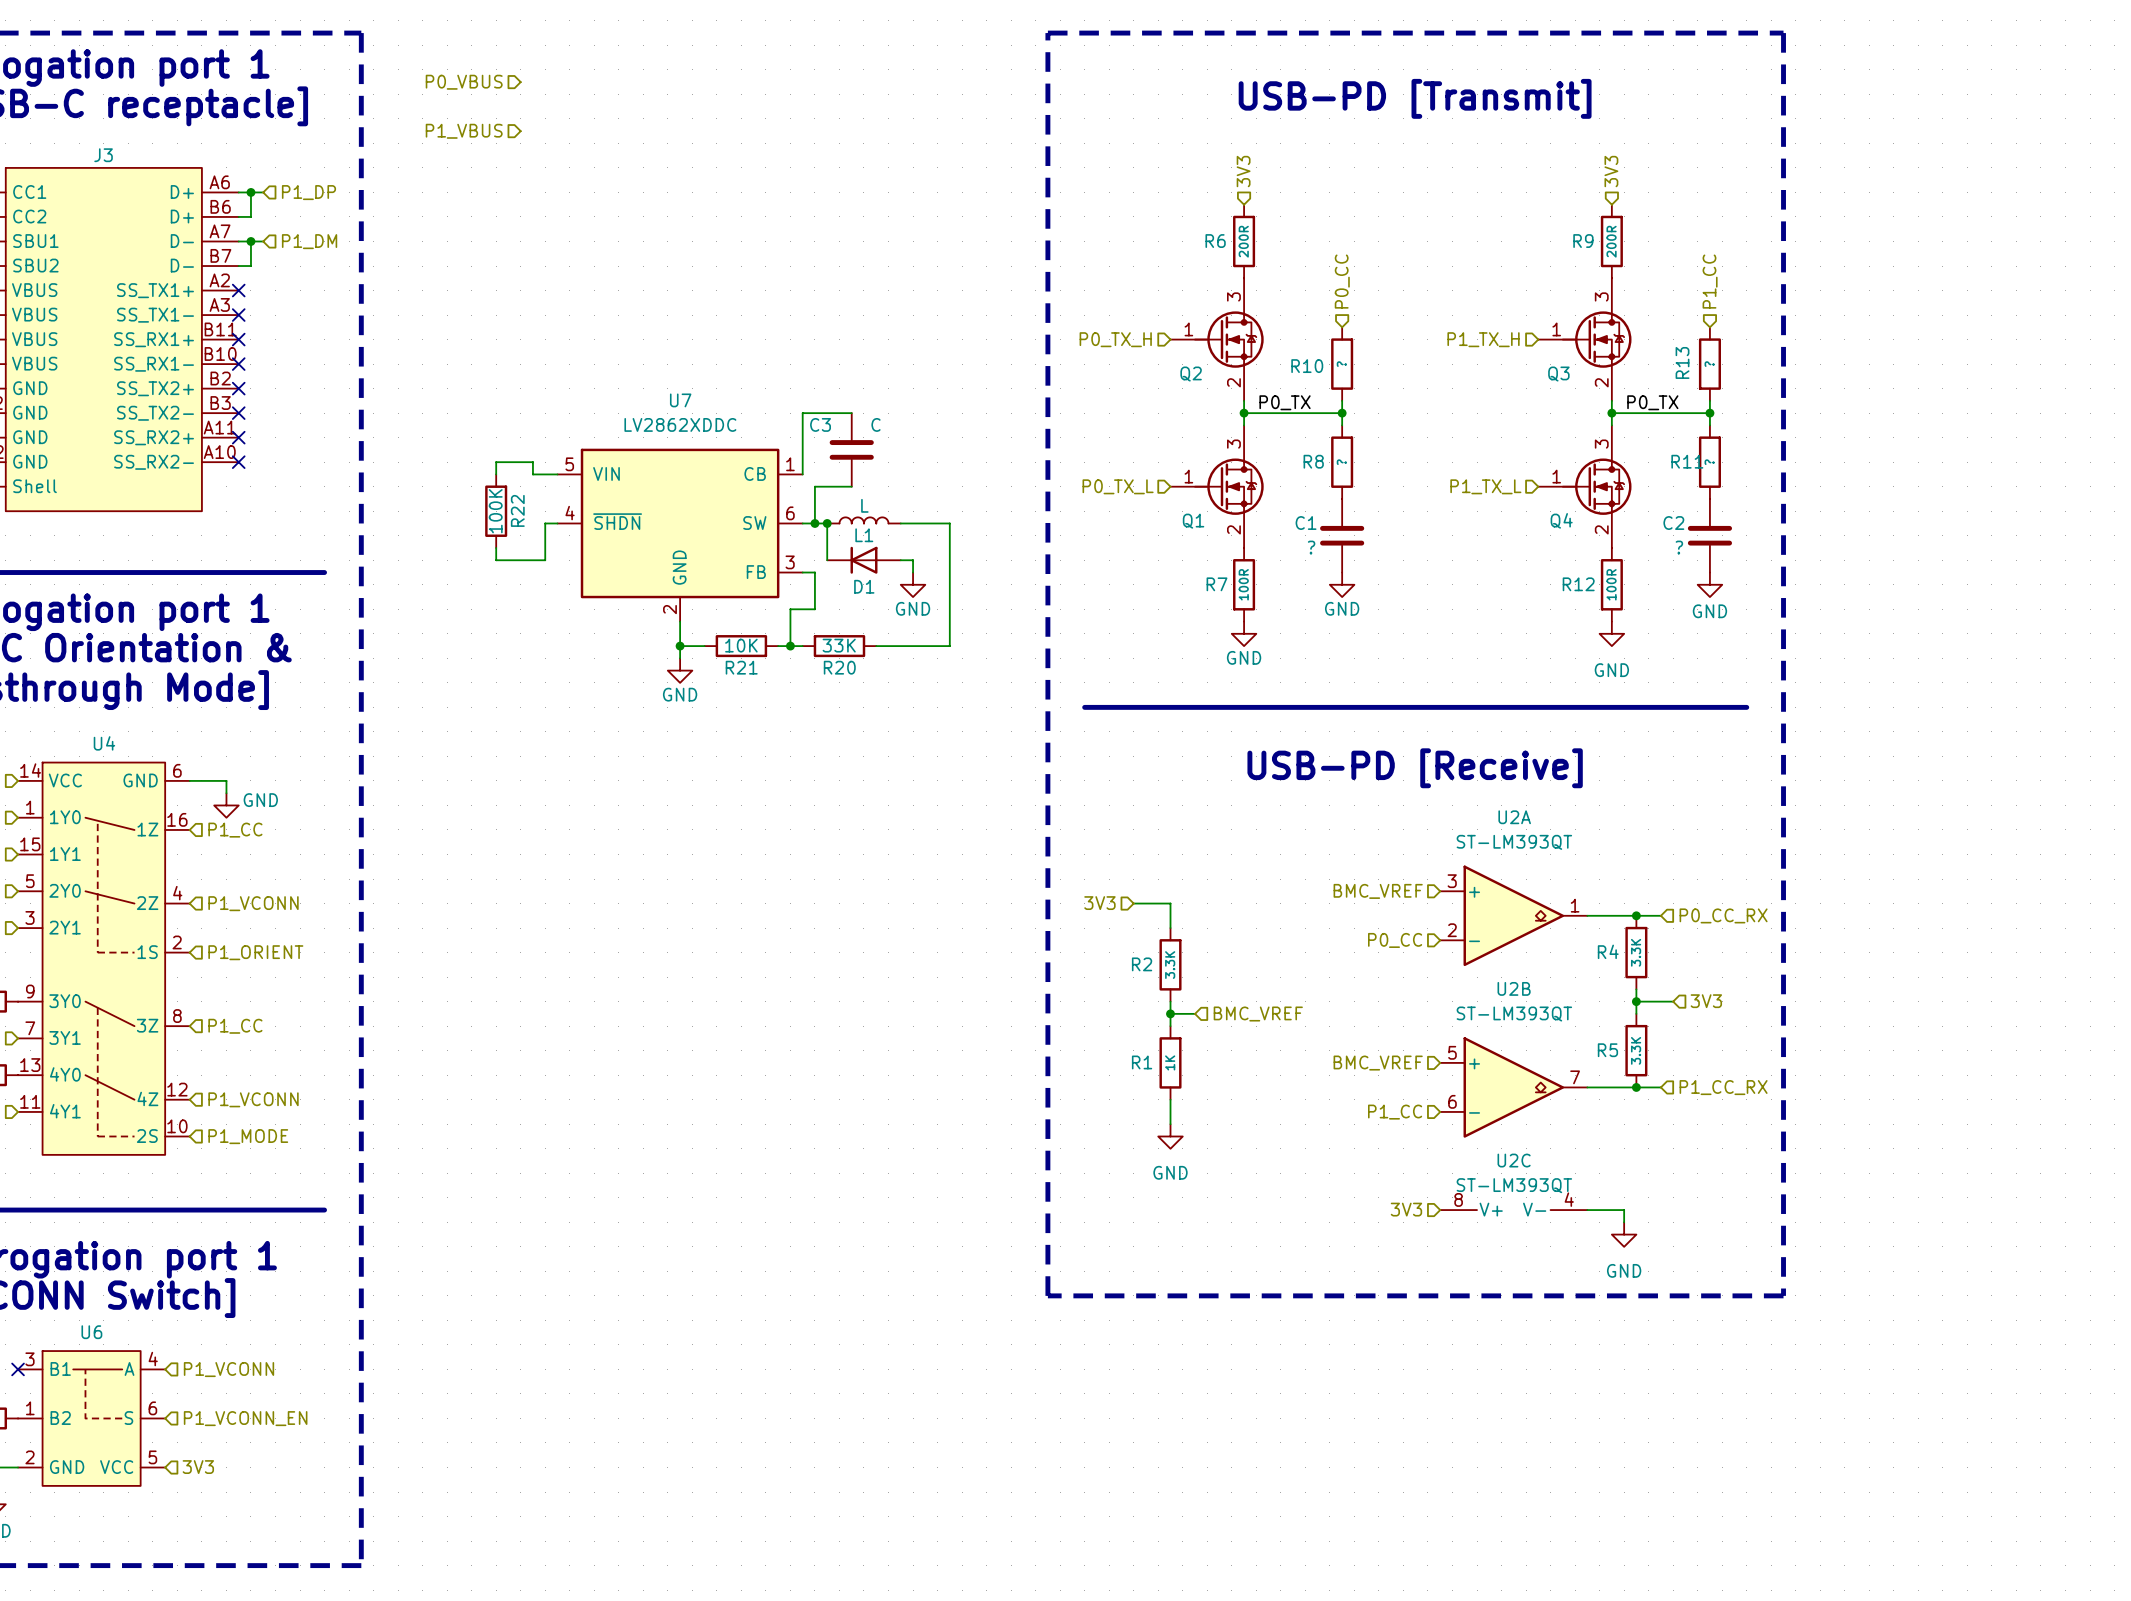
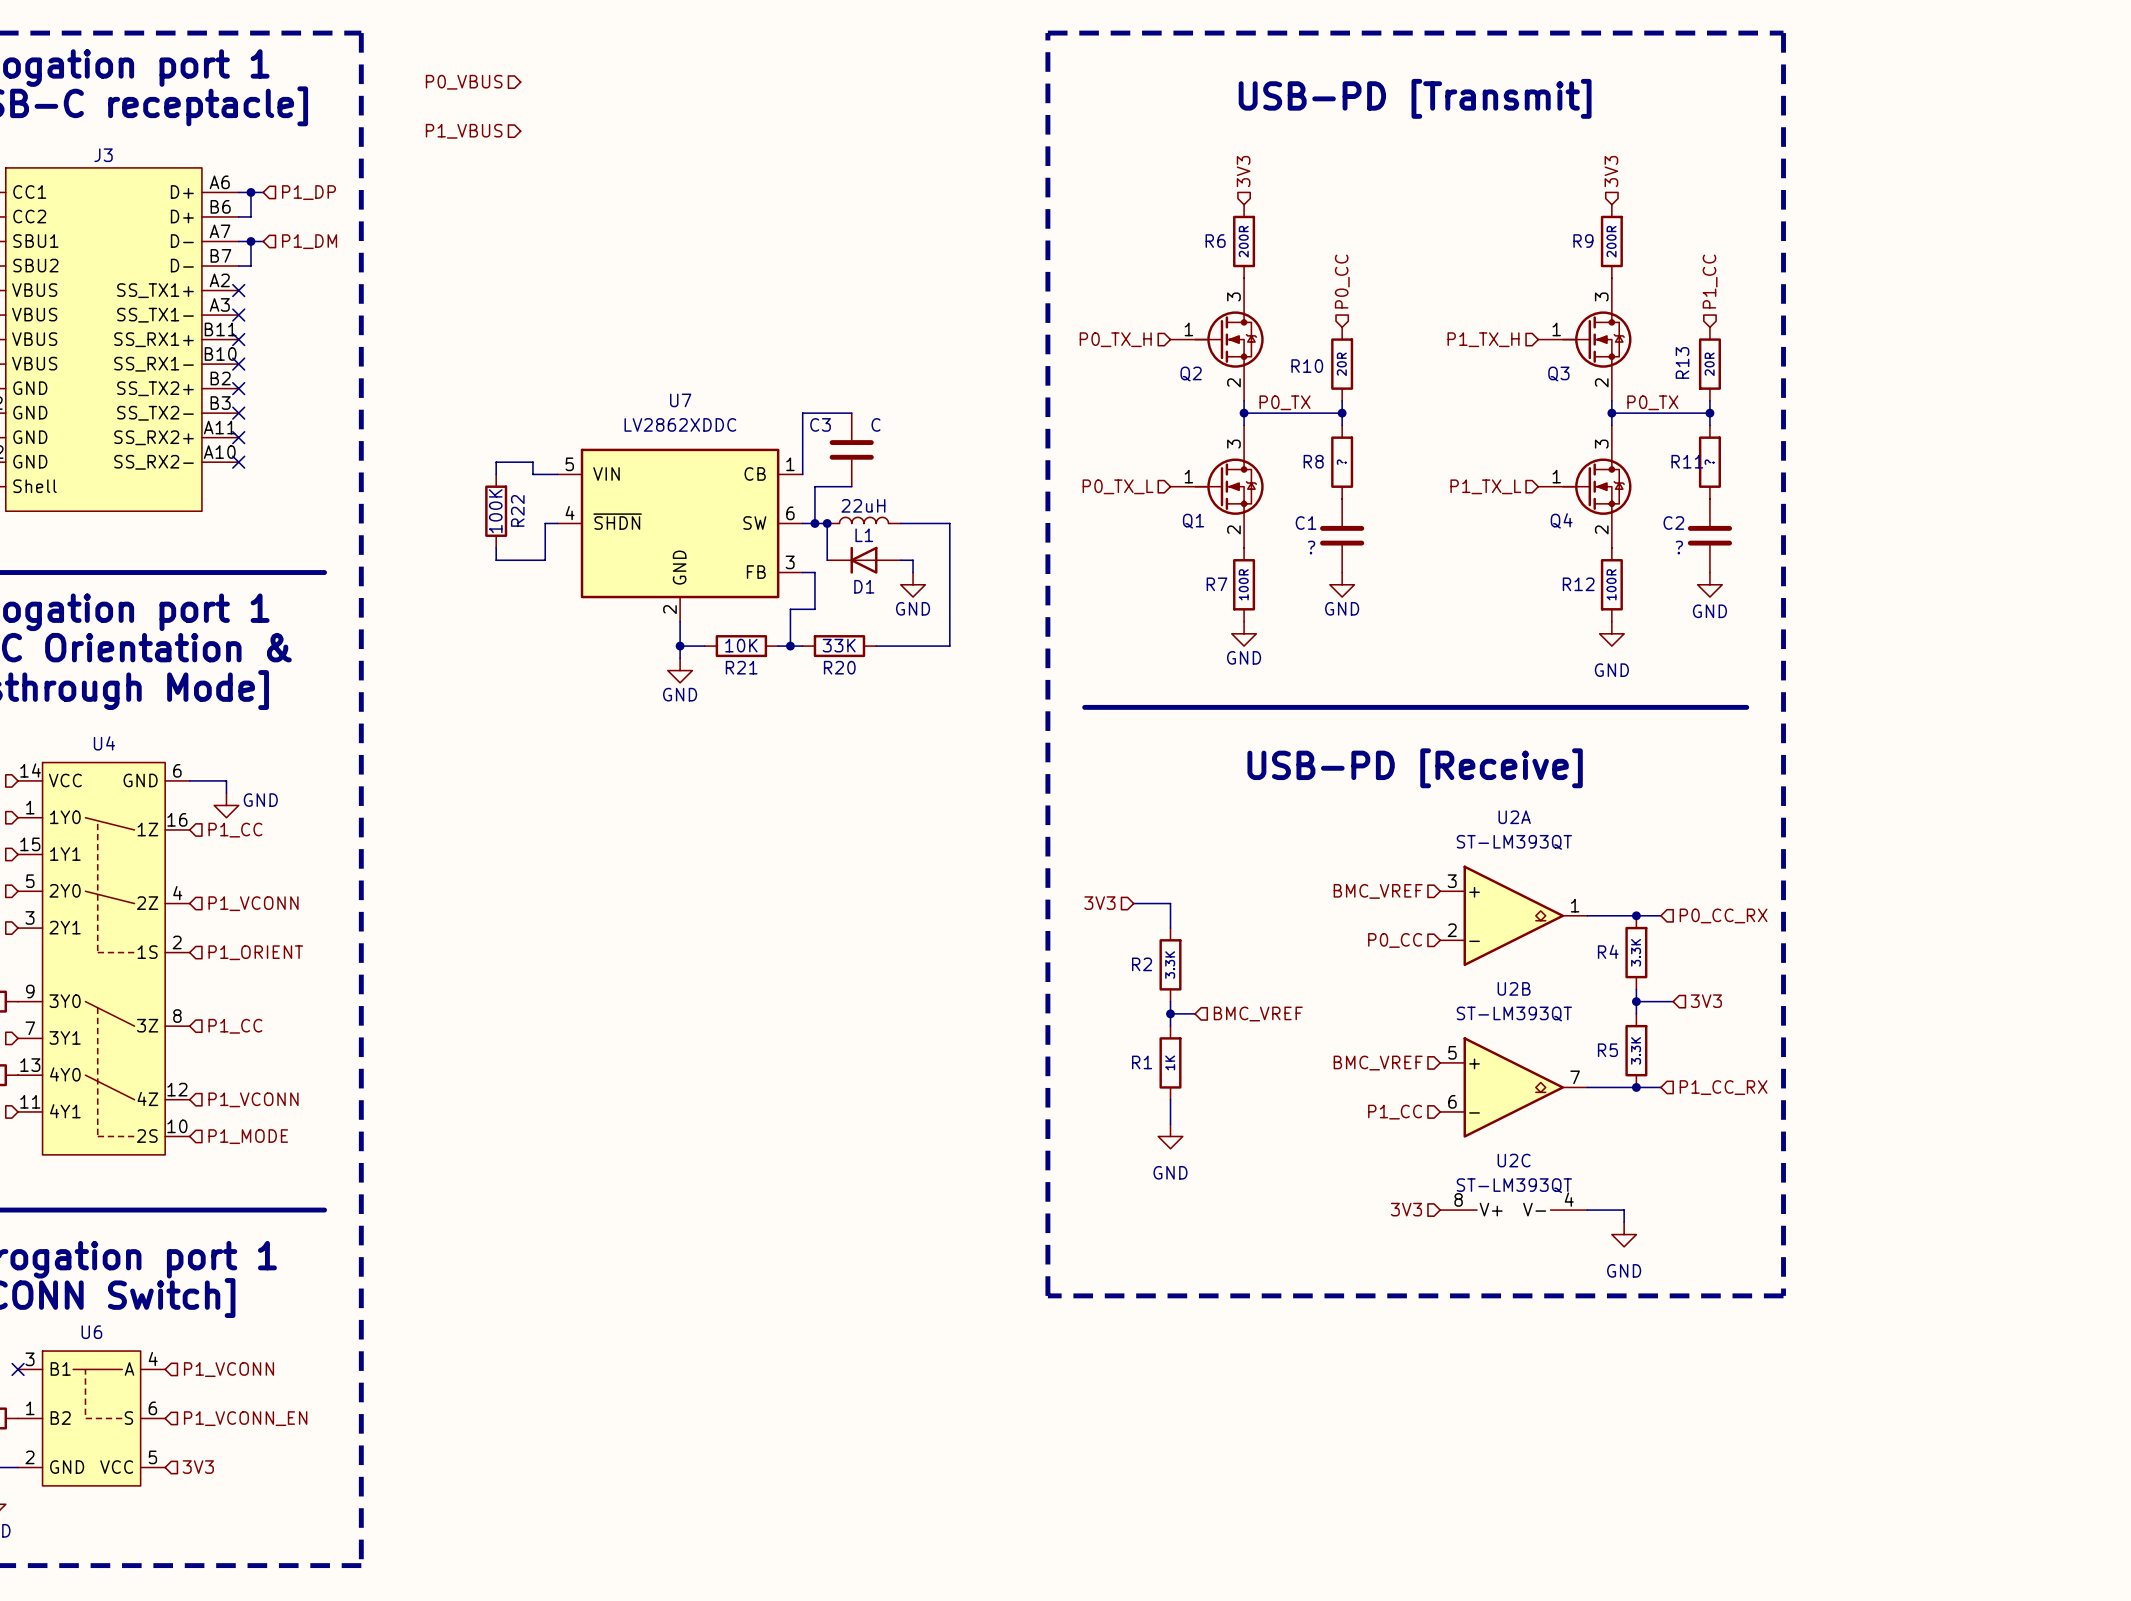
R10 value: ? (1341, 364) -> 20R (1341, 364)
R13 value: ? (1709, 364) -> 20R (1709, 364)
L1 value: L (864, 505) -> 22uH (863, 505)

